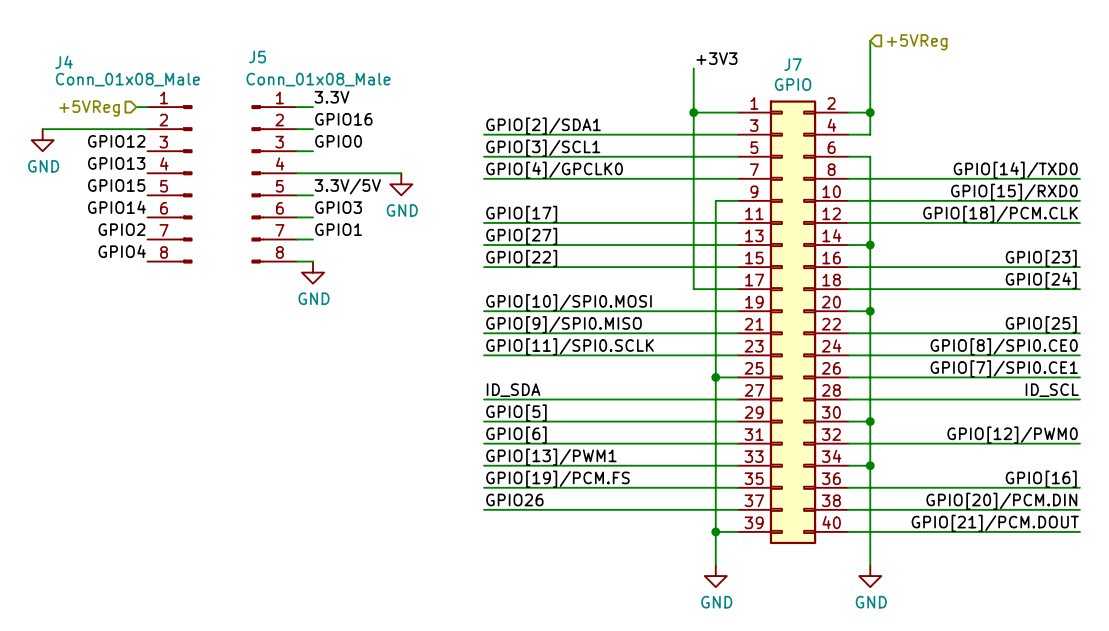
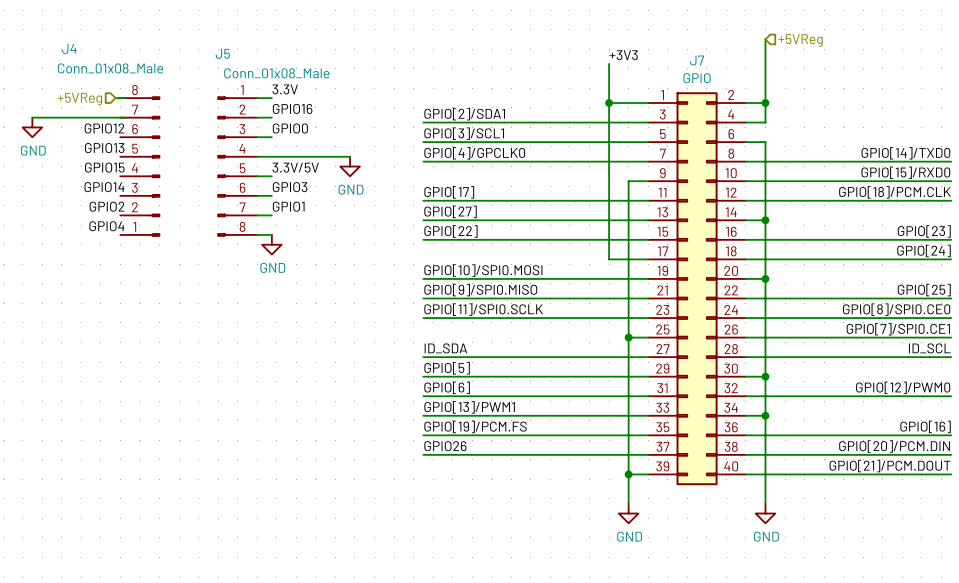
J4 name position: J4 (64, 62) -> J4 (69, 48)
J4 value position: Conn_01x08_Male (127, 79) -> Conn_01x08_Male (110, 68)
J4 flip: as is (186, 184) -> up-down (154, 166)

